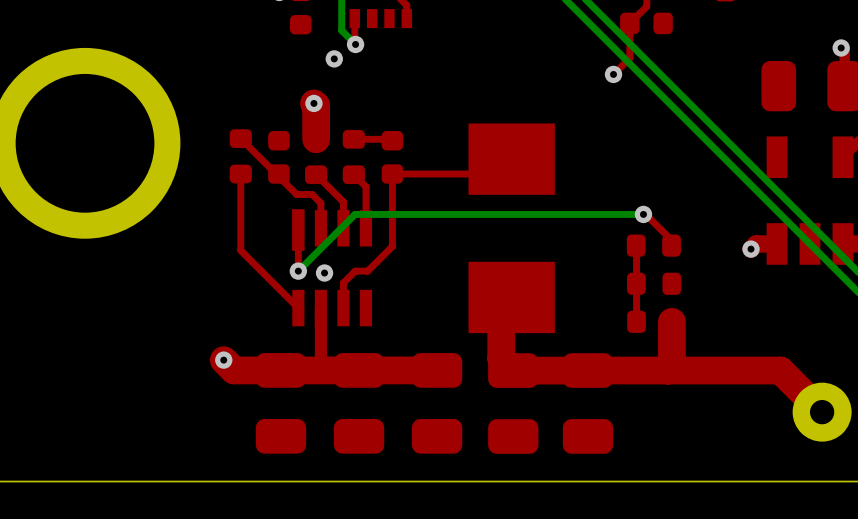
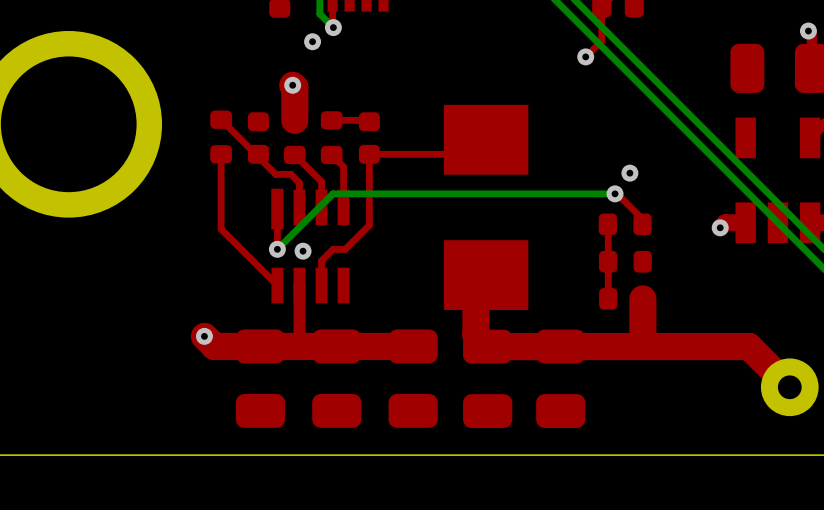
via: none -> (629, 173)

